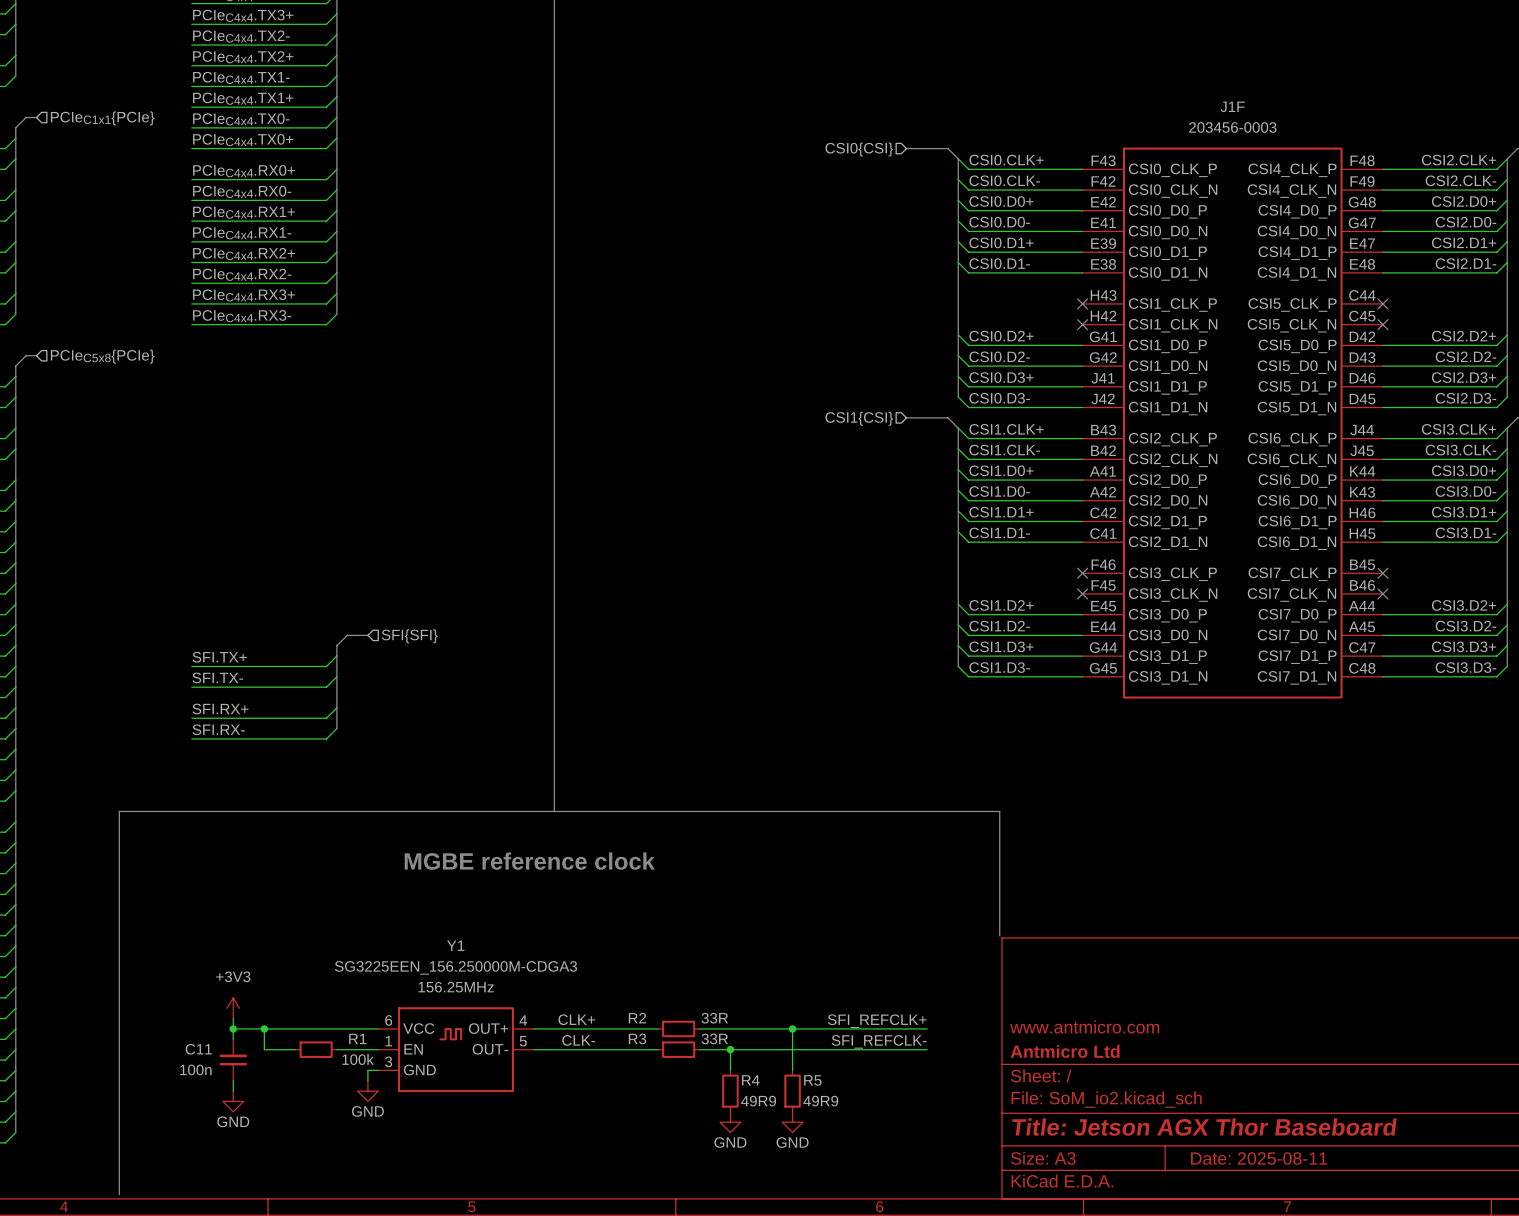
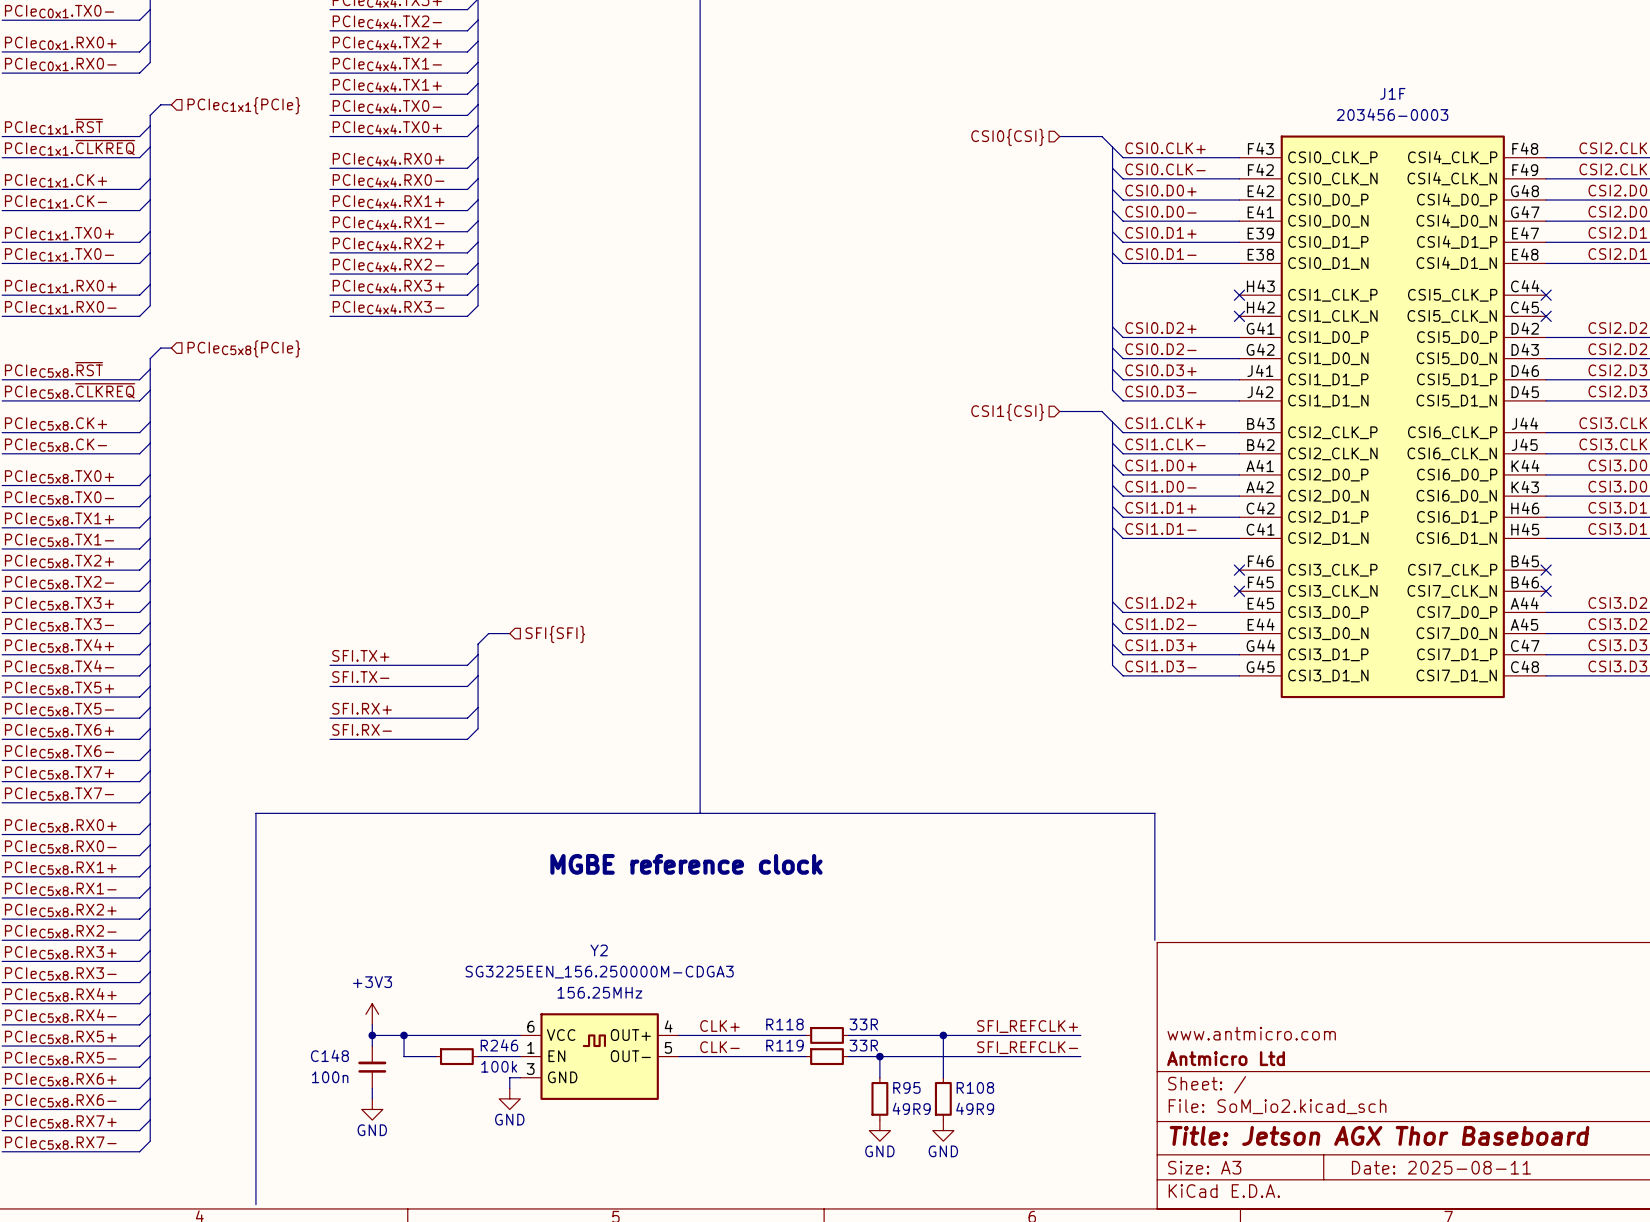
Y1 name: Y1 (455, 945) -> Y2 (599, 950)
R2 name: R2 (637, 1018) -> R118 (784, 1024)
R1 name: R1 (357, 1038) -> R246 (499, 1045)
R3 name: R3 (637, 1038) -> R119 (784, 1045)
C11 name: C11 (198, 1049) -> C148 (329, 1055)
R4 name: R4 (750, 1080) -> R95 (906, 1087)
R5 name: R5 (812, 1080) -> R108 (975, 1087)

